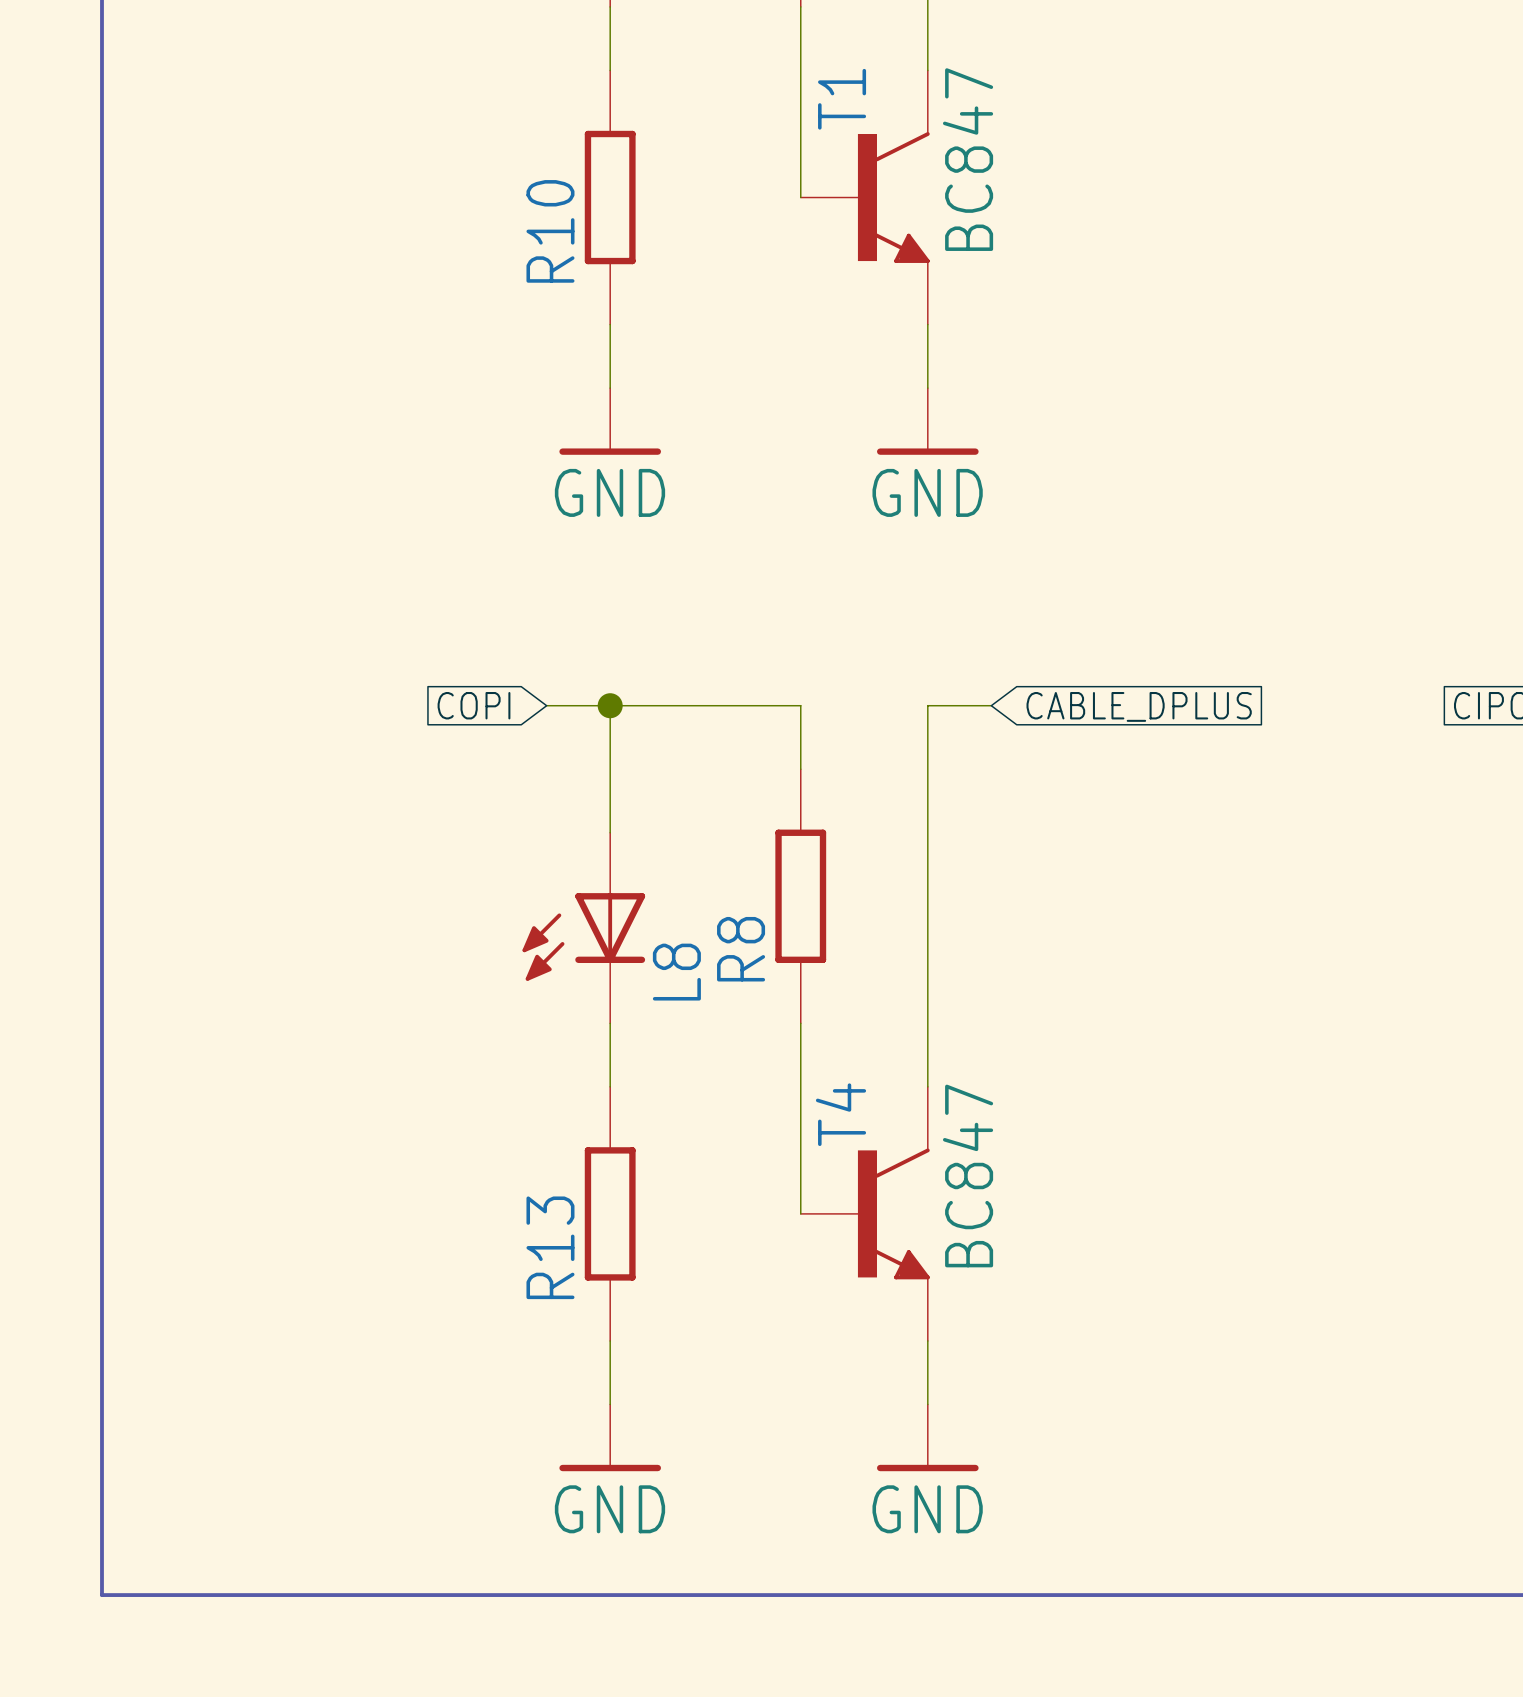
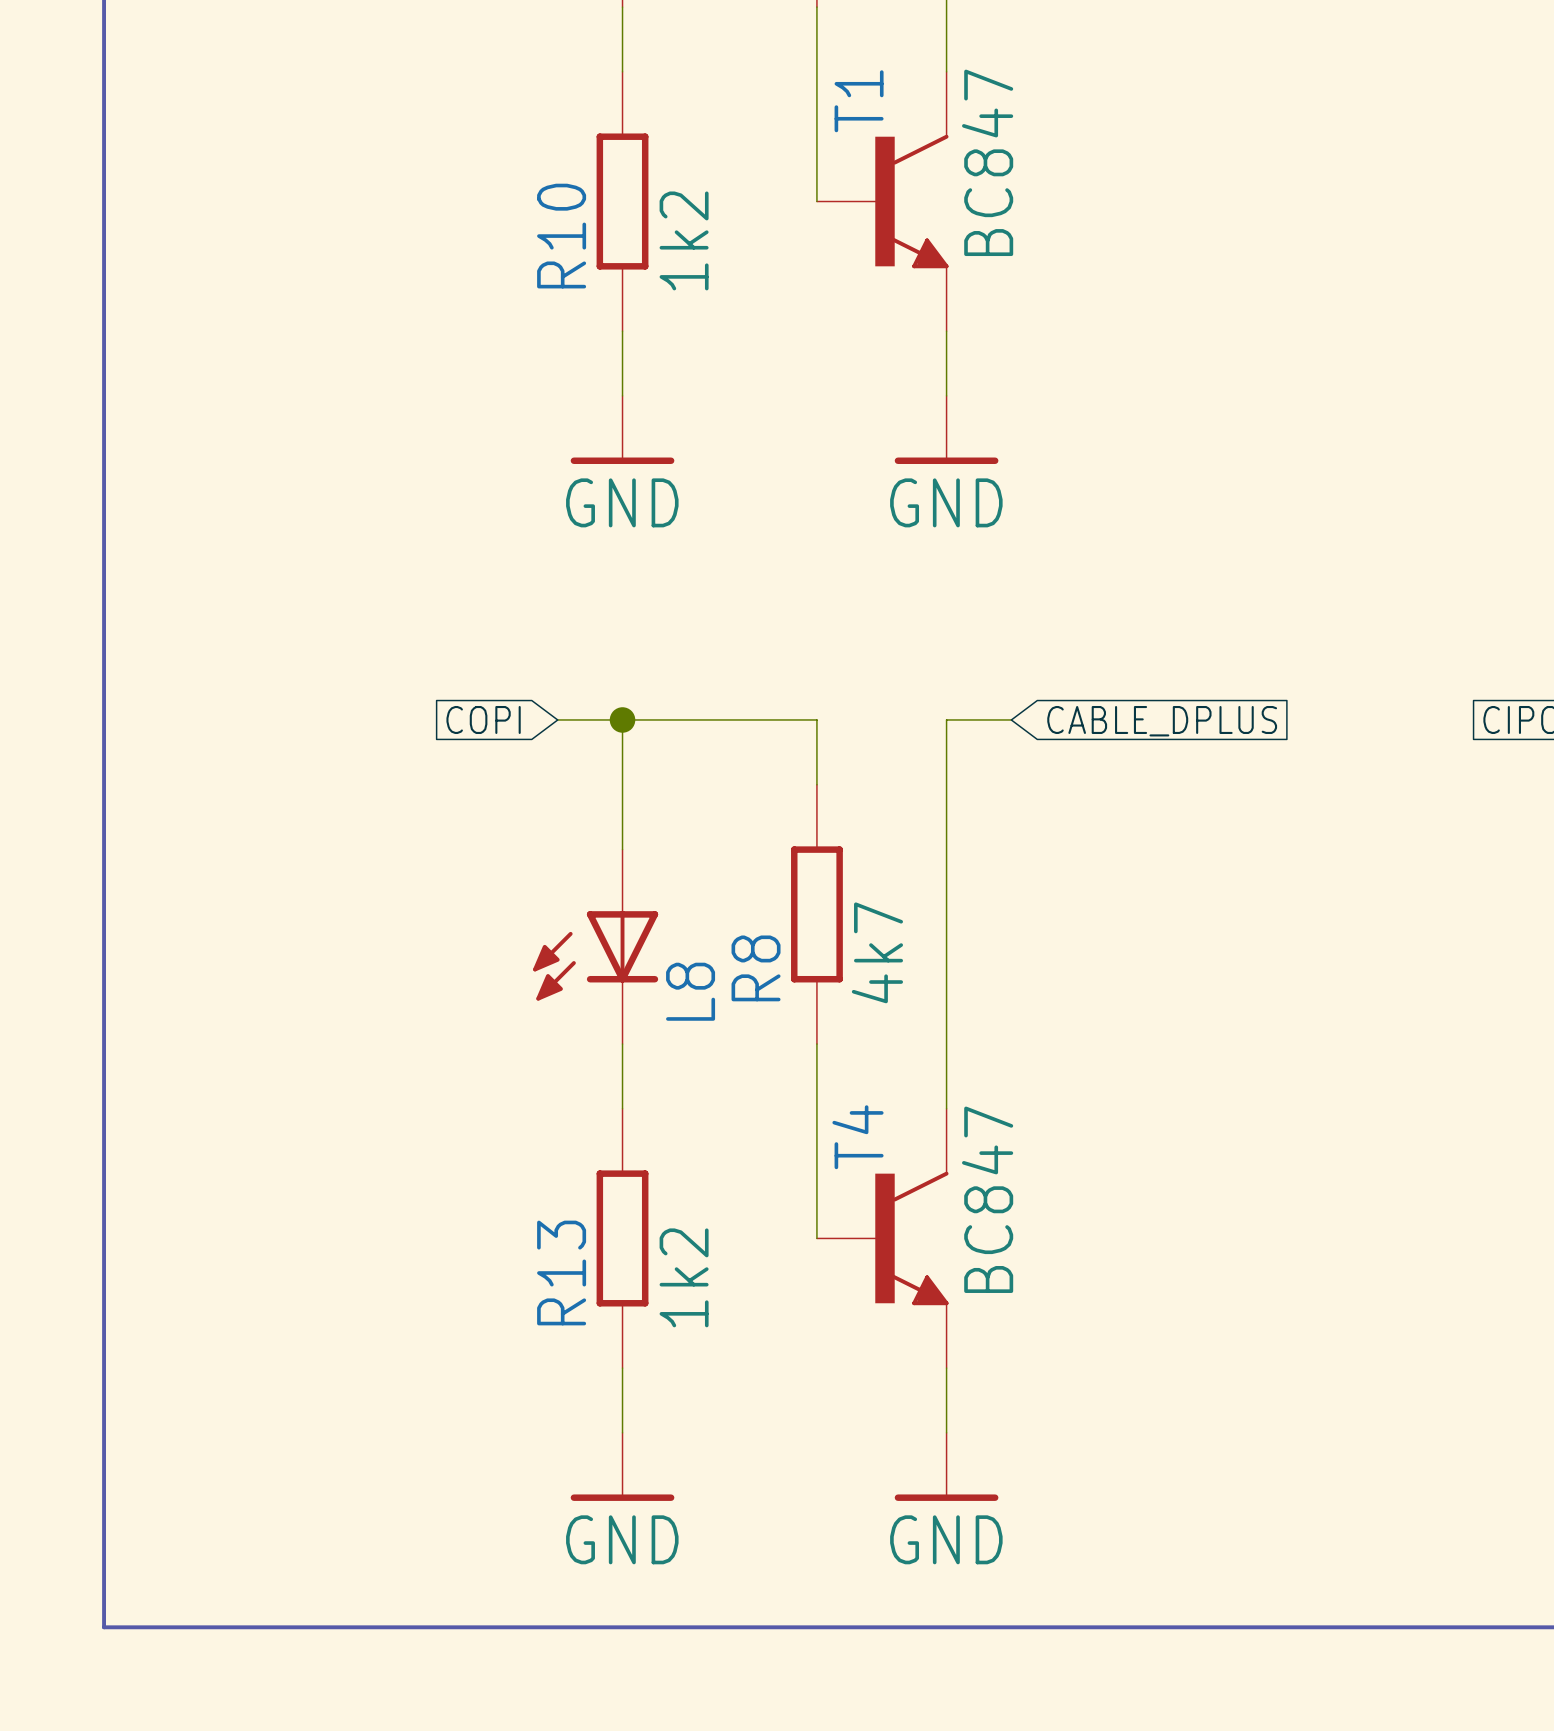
R10 value: none -> 1k2 (684, 240)
R8 value: none -> 4k7 (877, 952)
R13 value: none -> 1k2 (684, 1277)

